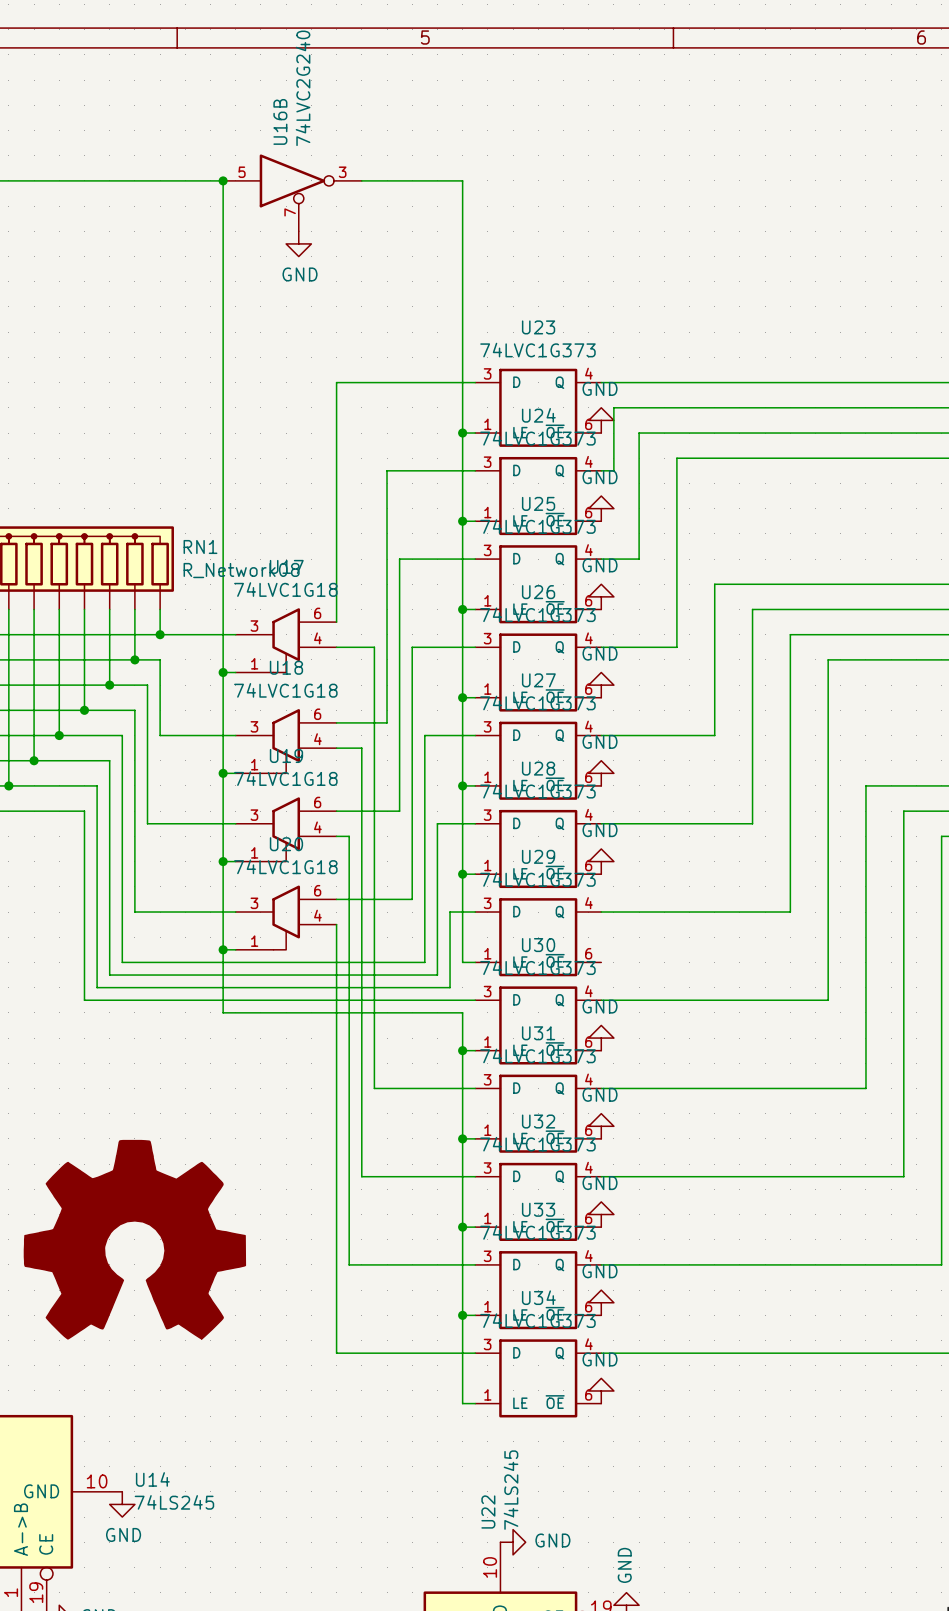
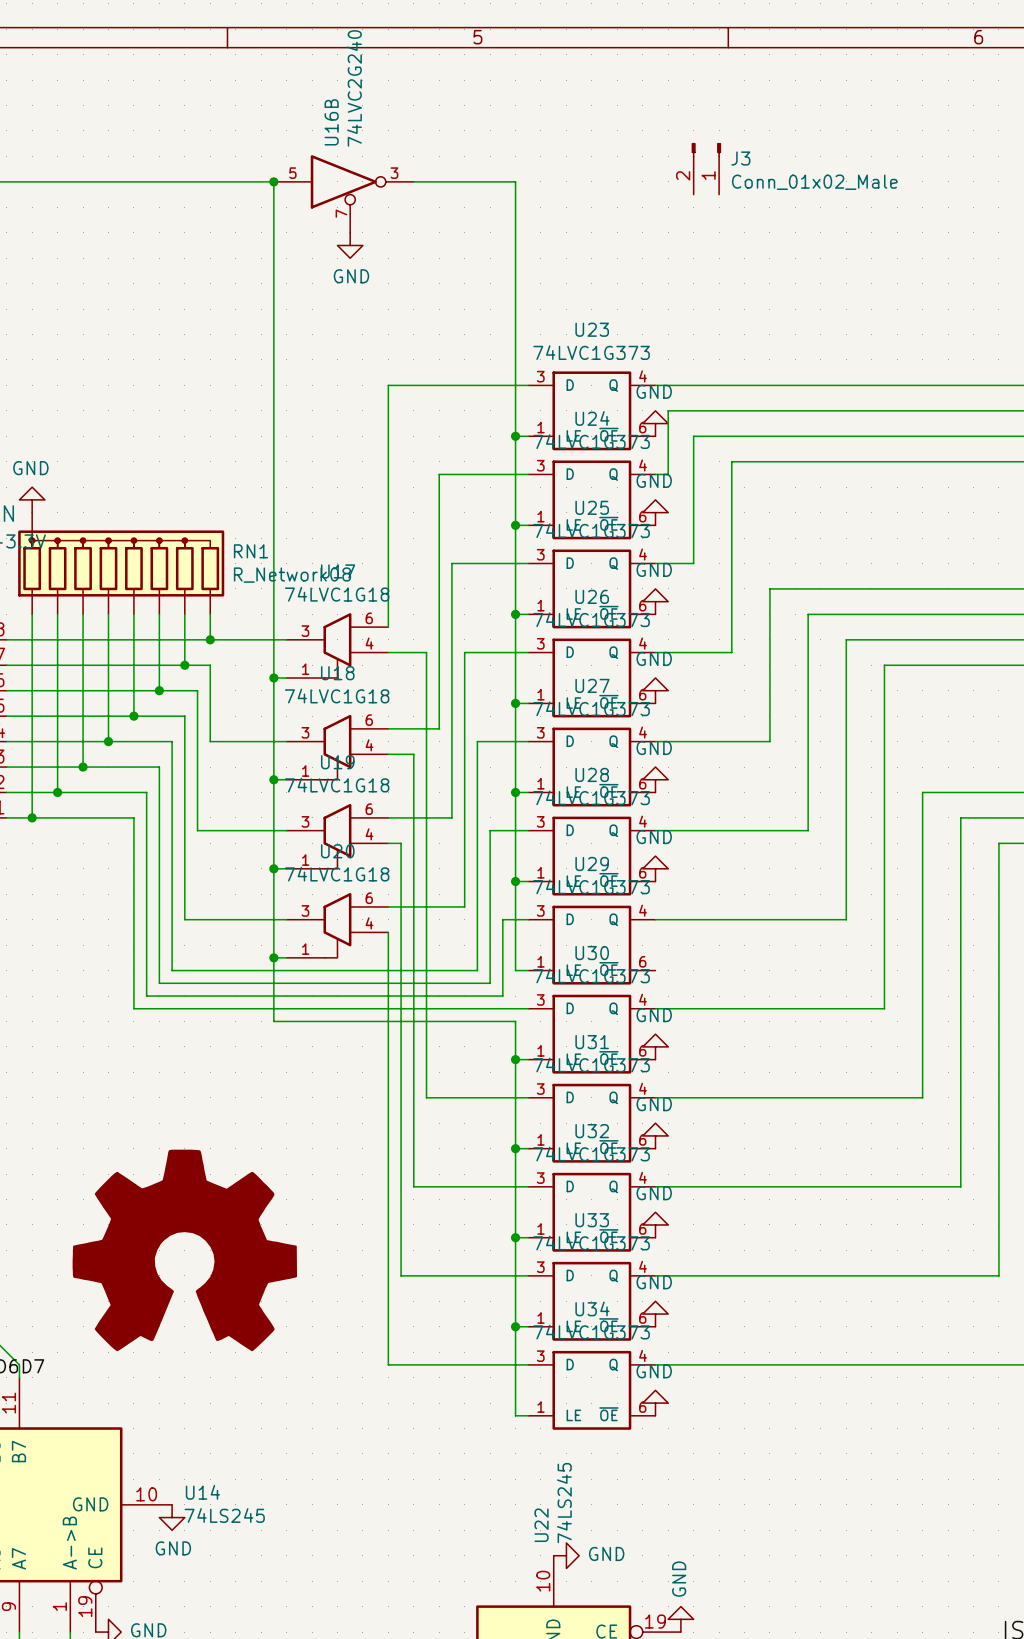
J3: none -> Conn_01x02_Male (706, 168)

